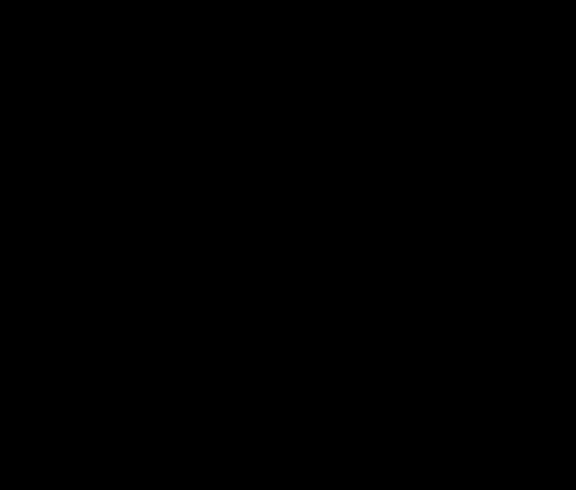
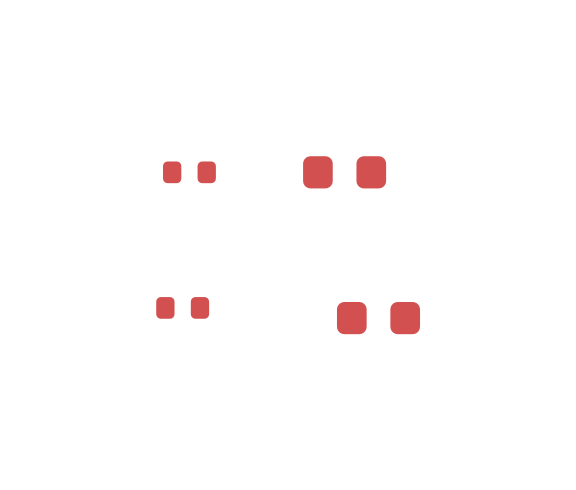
part: none -> (189, 172)
part: none -> (344, 172)
part: none -> (182, 307)
part: none -> (378, 318)

